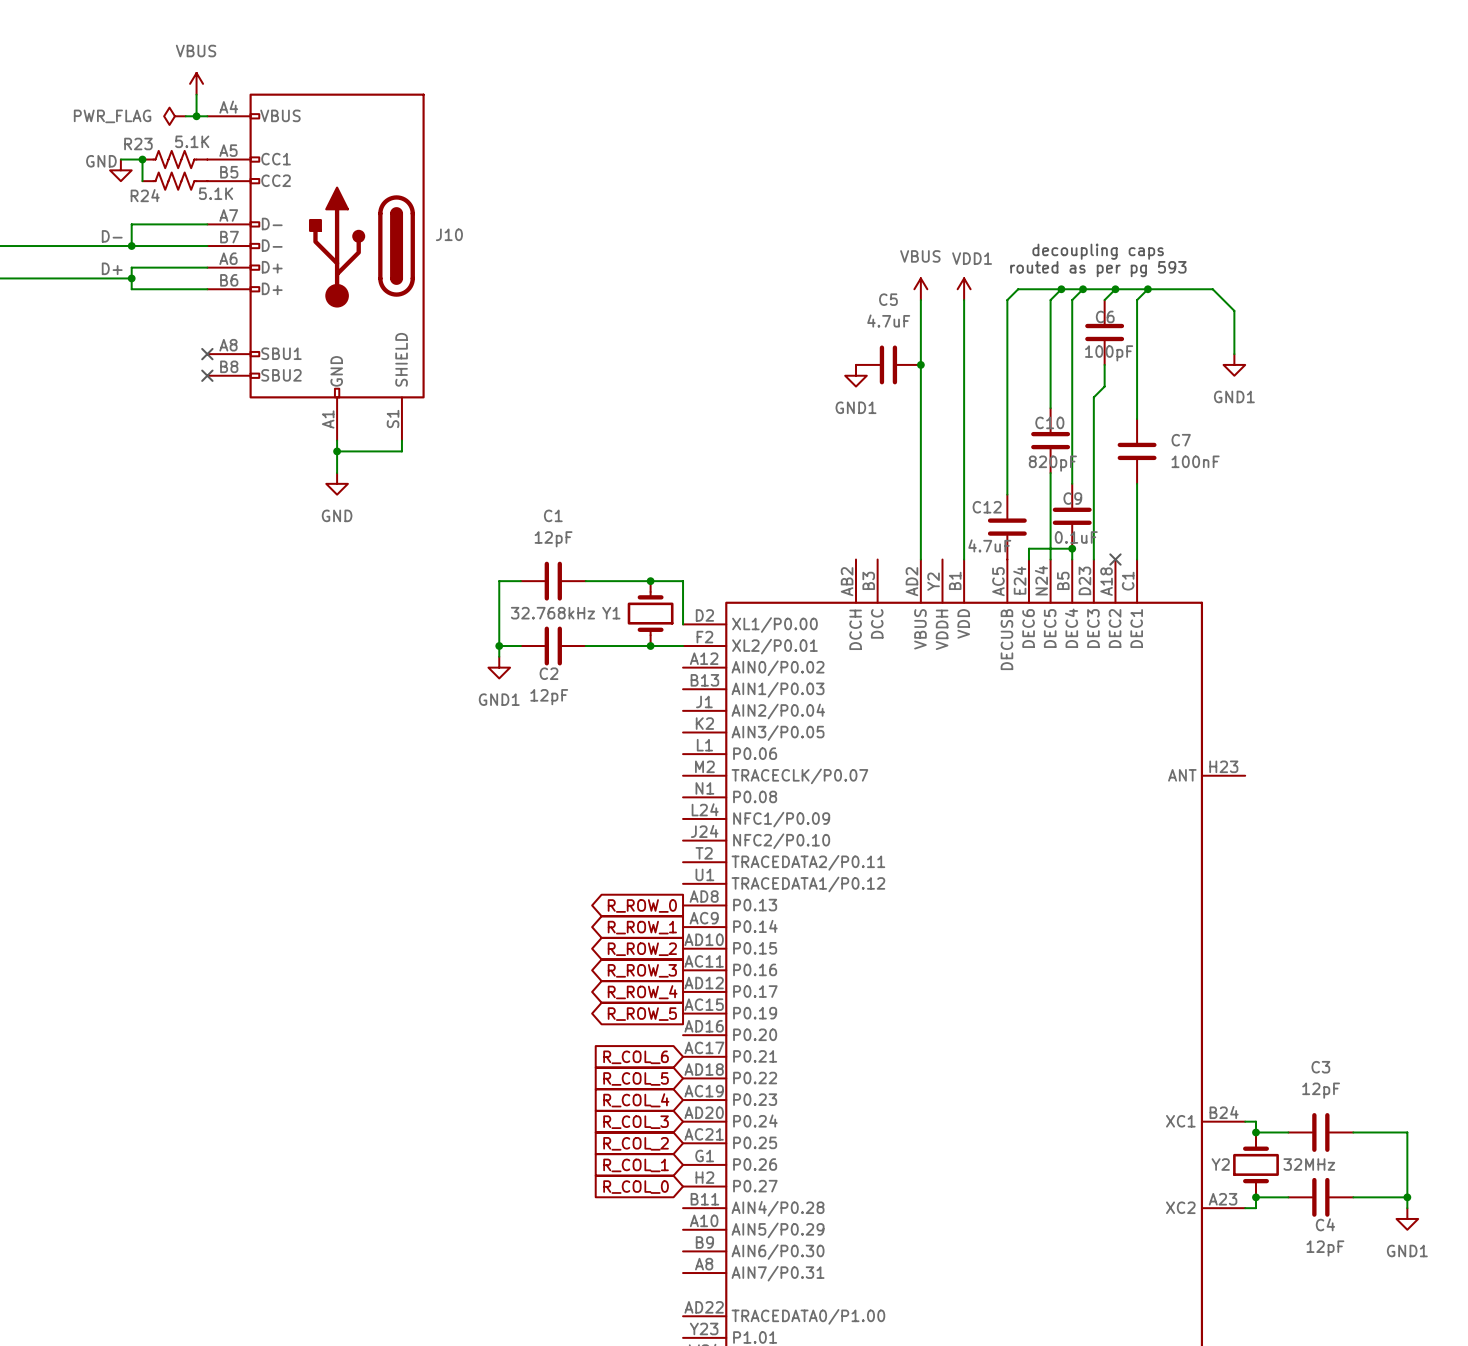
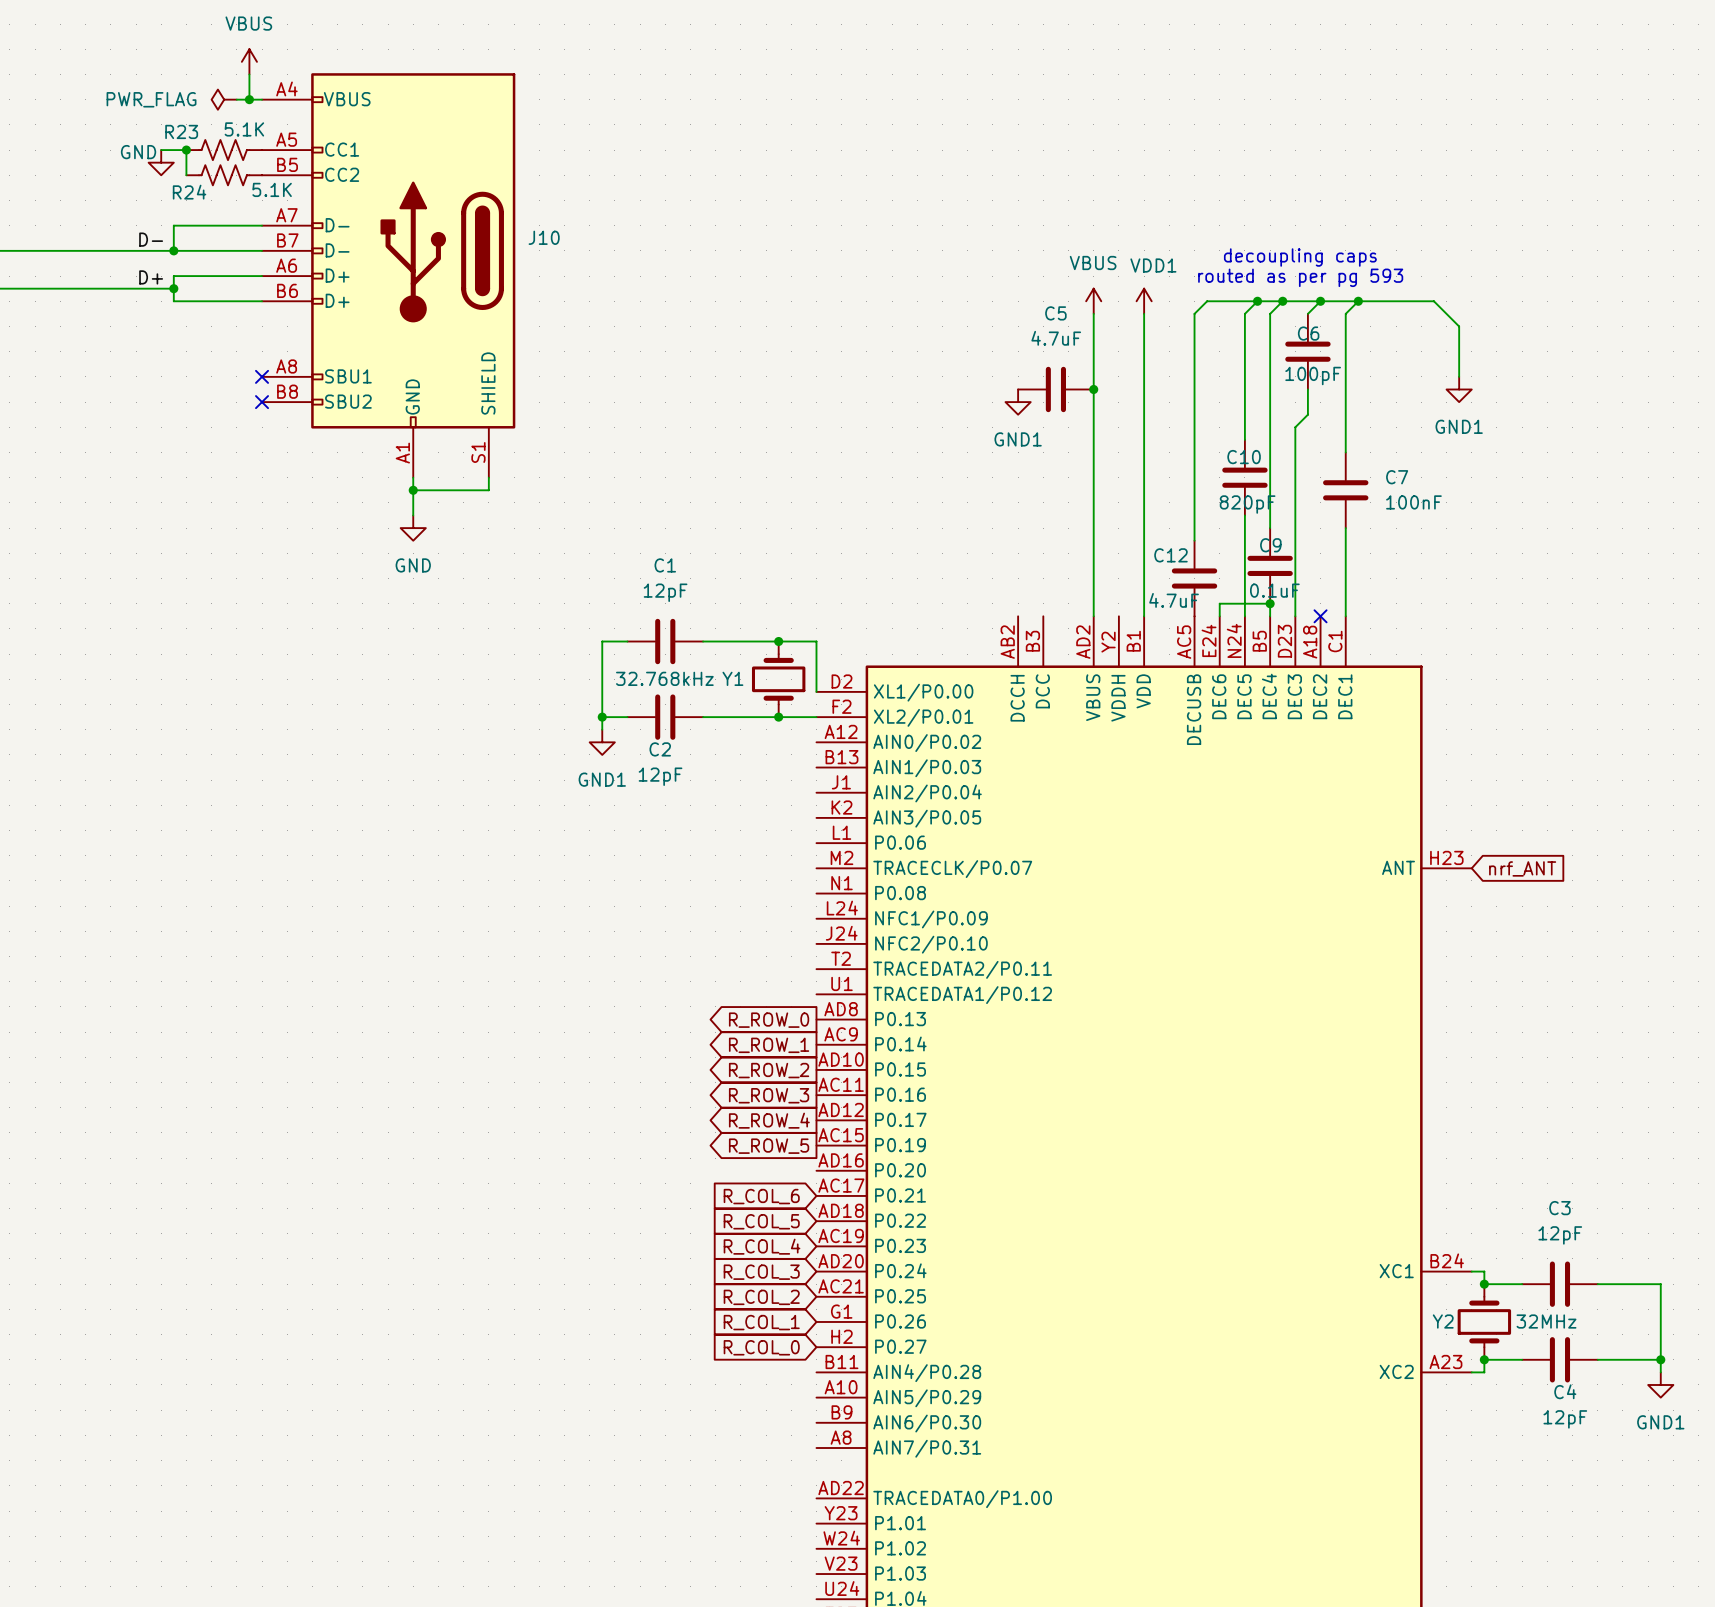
global label: none -> nrf_ANT (1522, 868)

